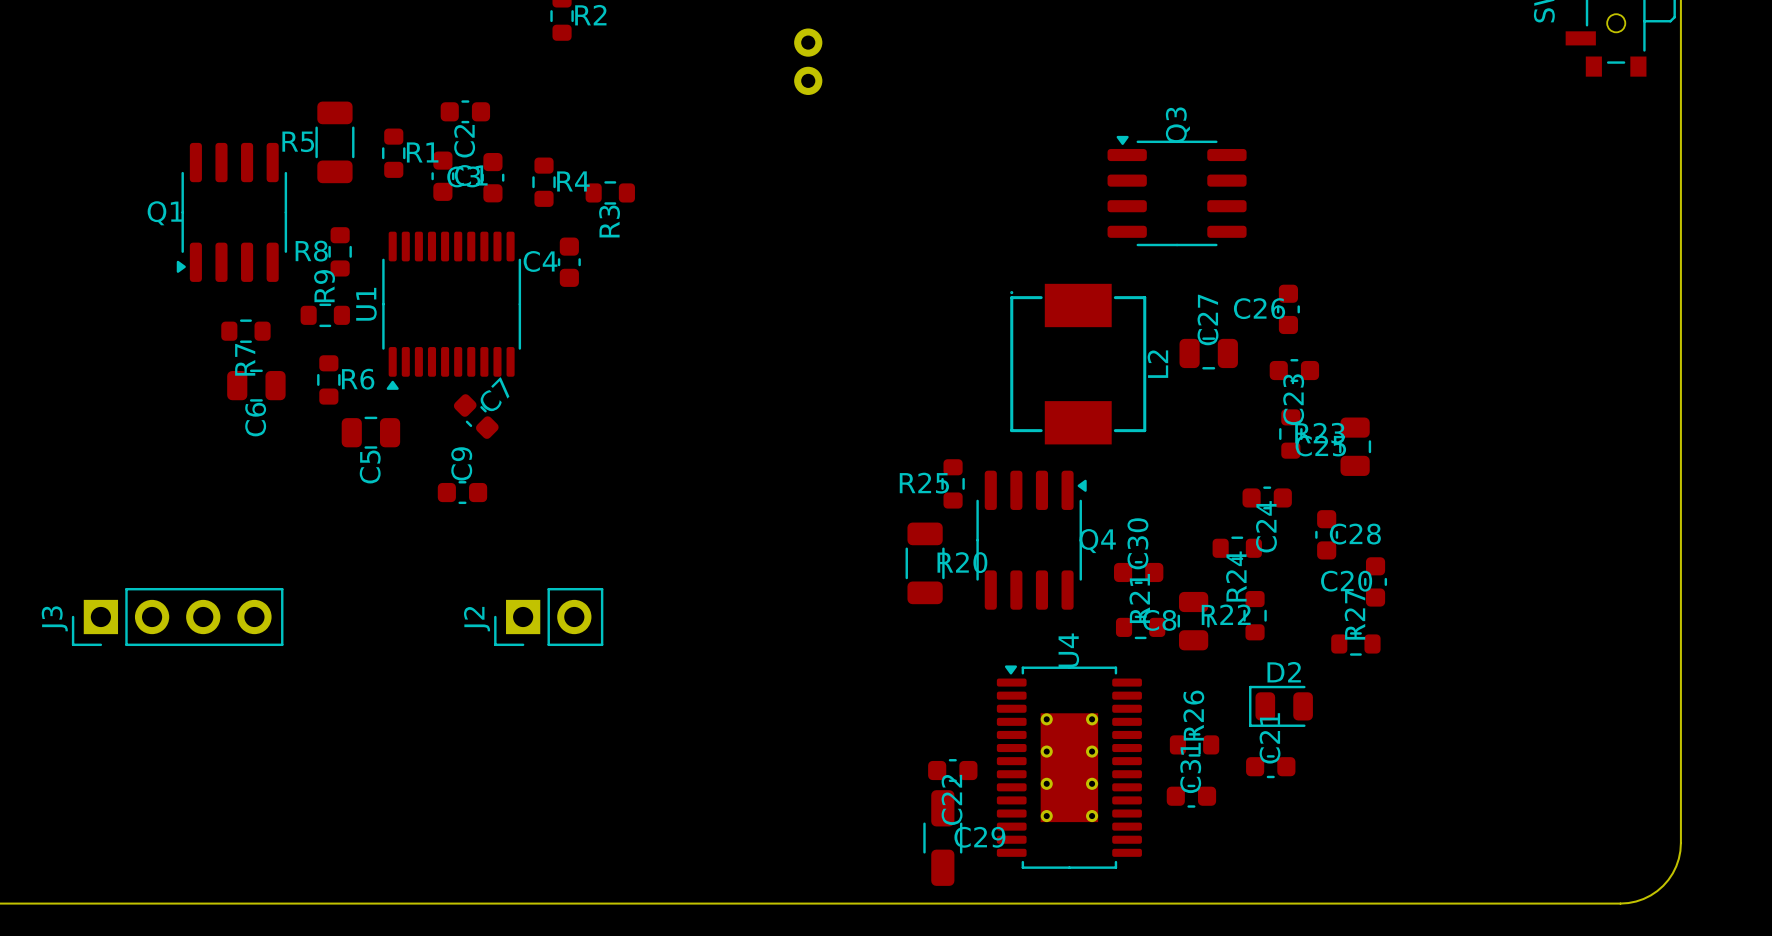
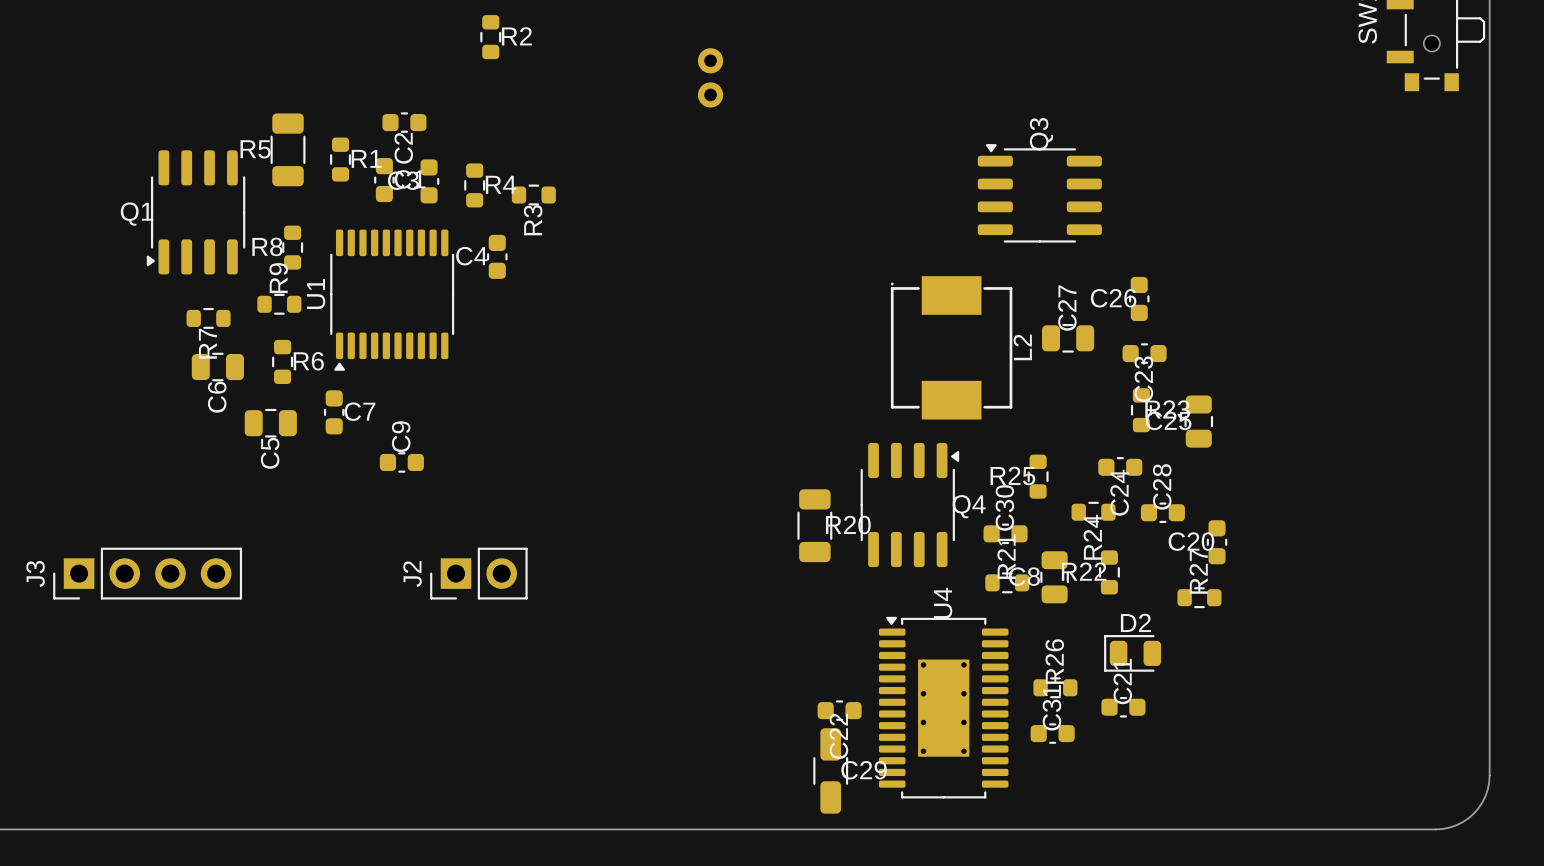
C7 rotation: 0° (476, 416) -> 45° clockwise (334, 412)
C7 position: (476, 416) -> (334, 412)
C5 position: (370, 432) -> (270, 423)
R25 position: (953, 483) -> (1038, 476)
C28 rotation: 0° (1326, 534) -> 90° clockwise (1162, 512)
C28 name position: C28 (1355, 534) -> C28 (1162, 486)

